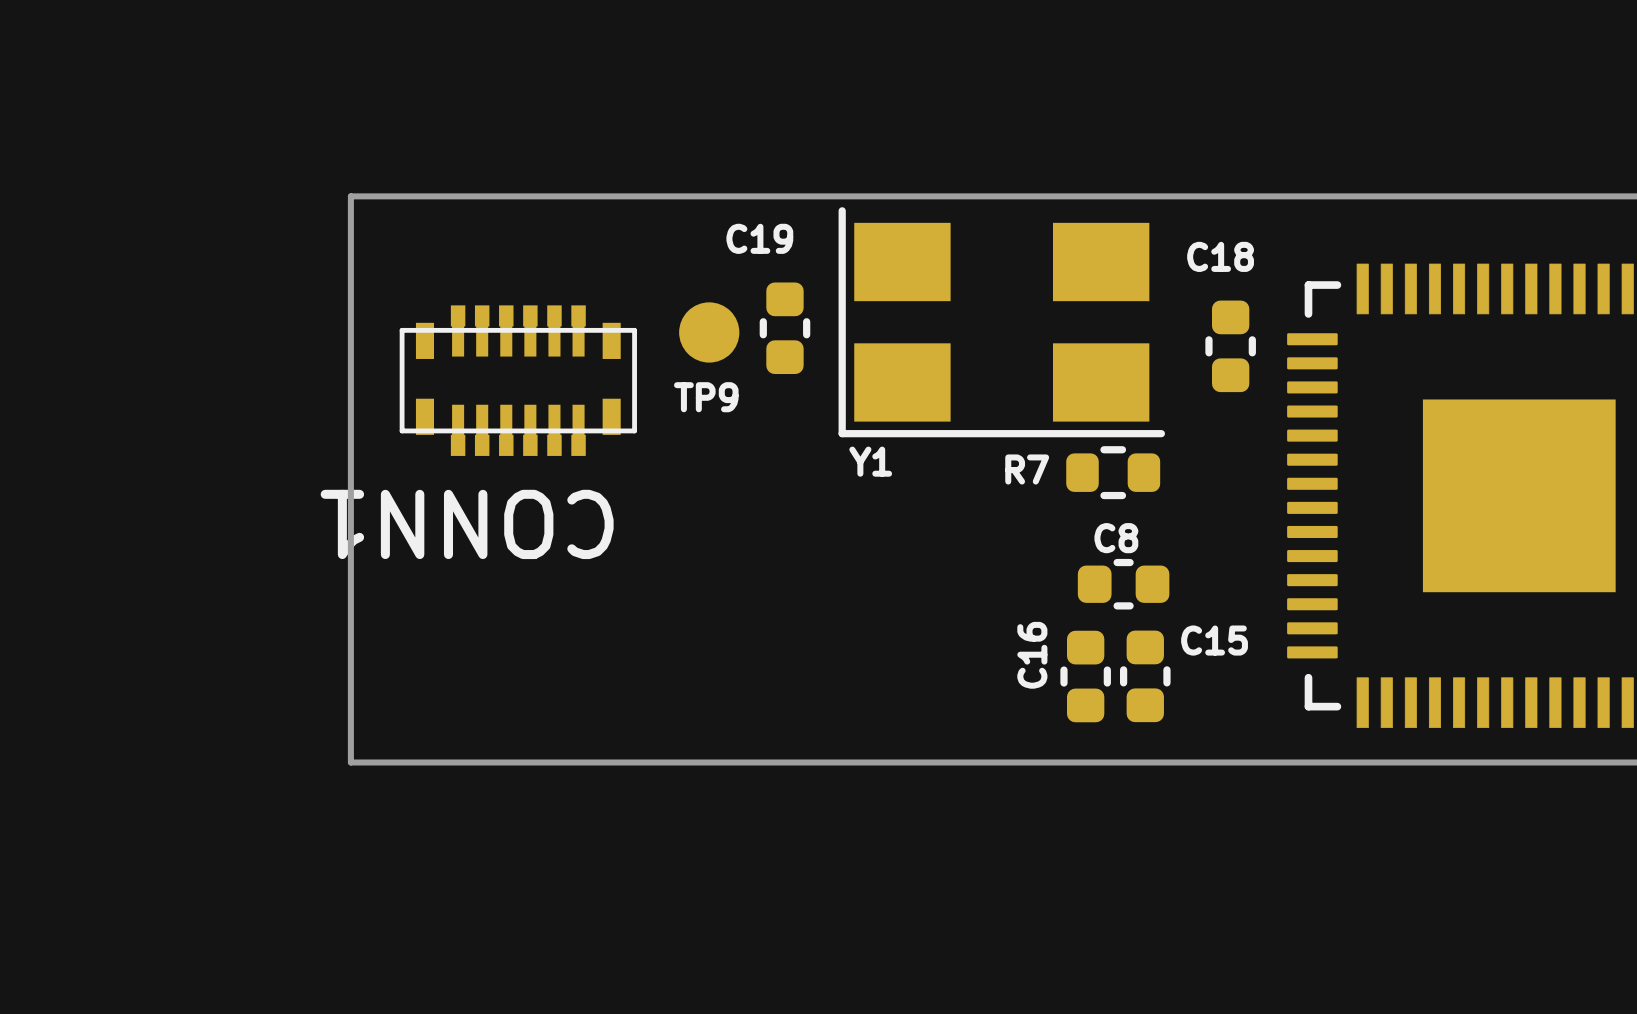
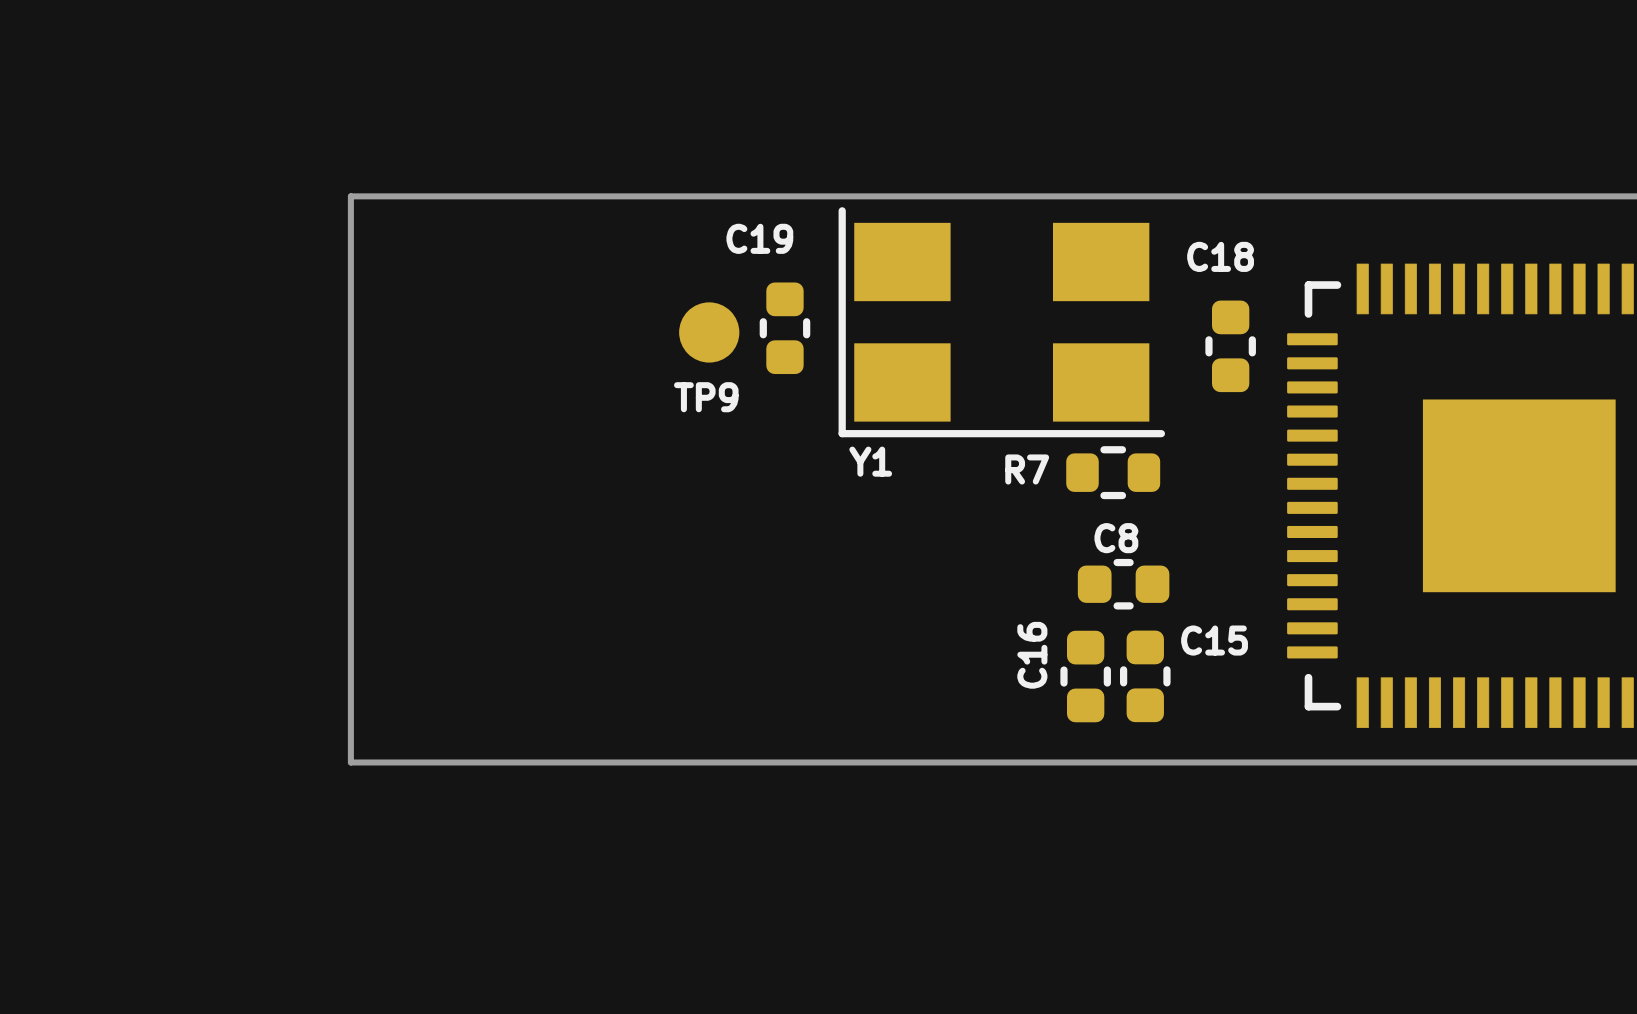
CONN1: (518, 380) -> none

